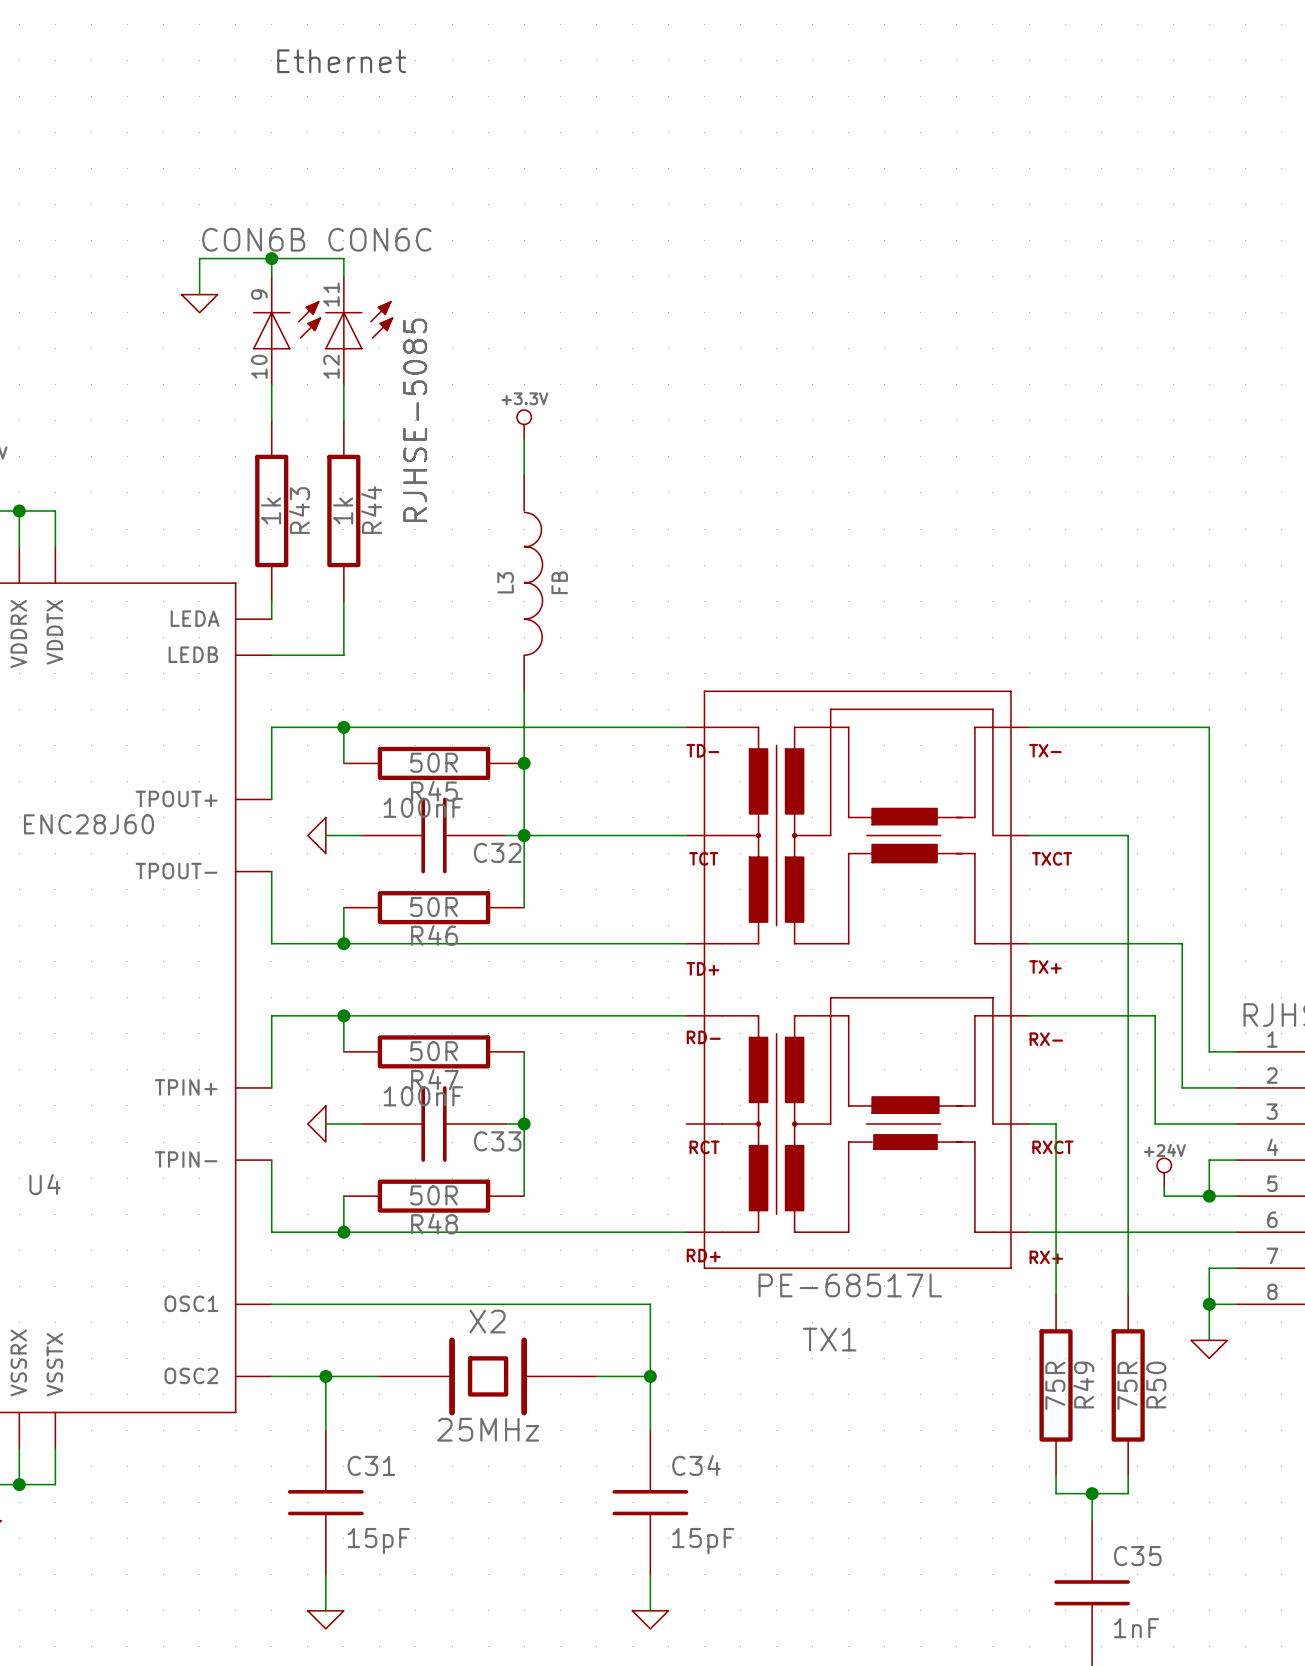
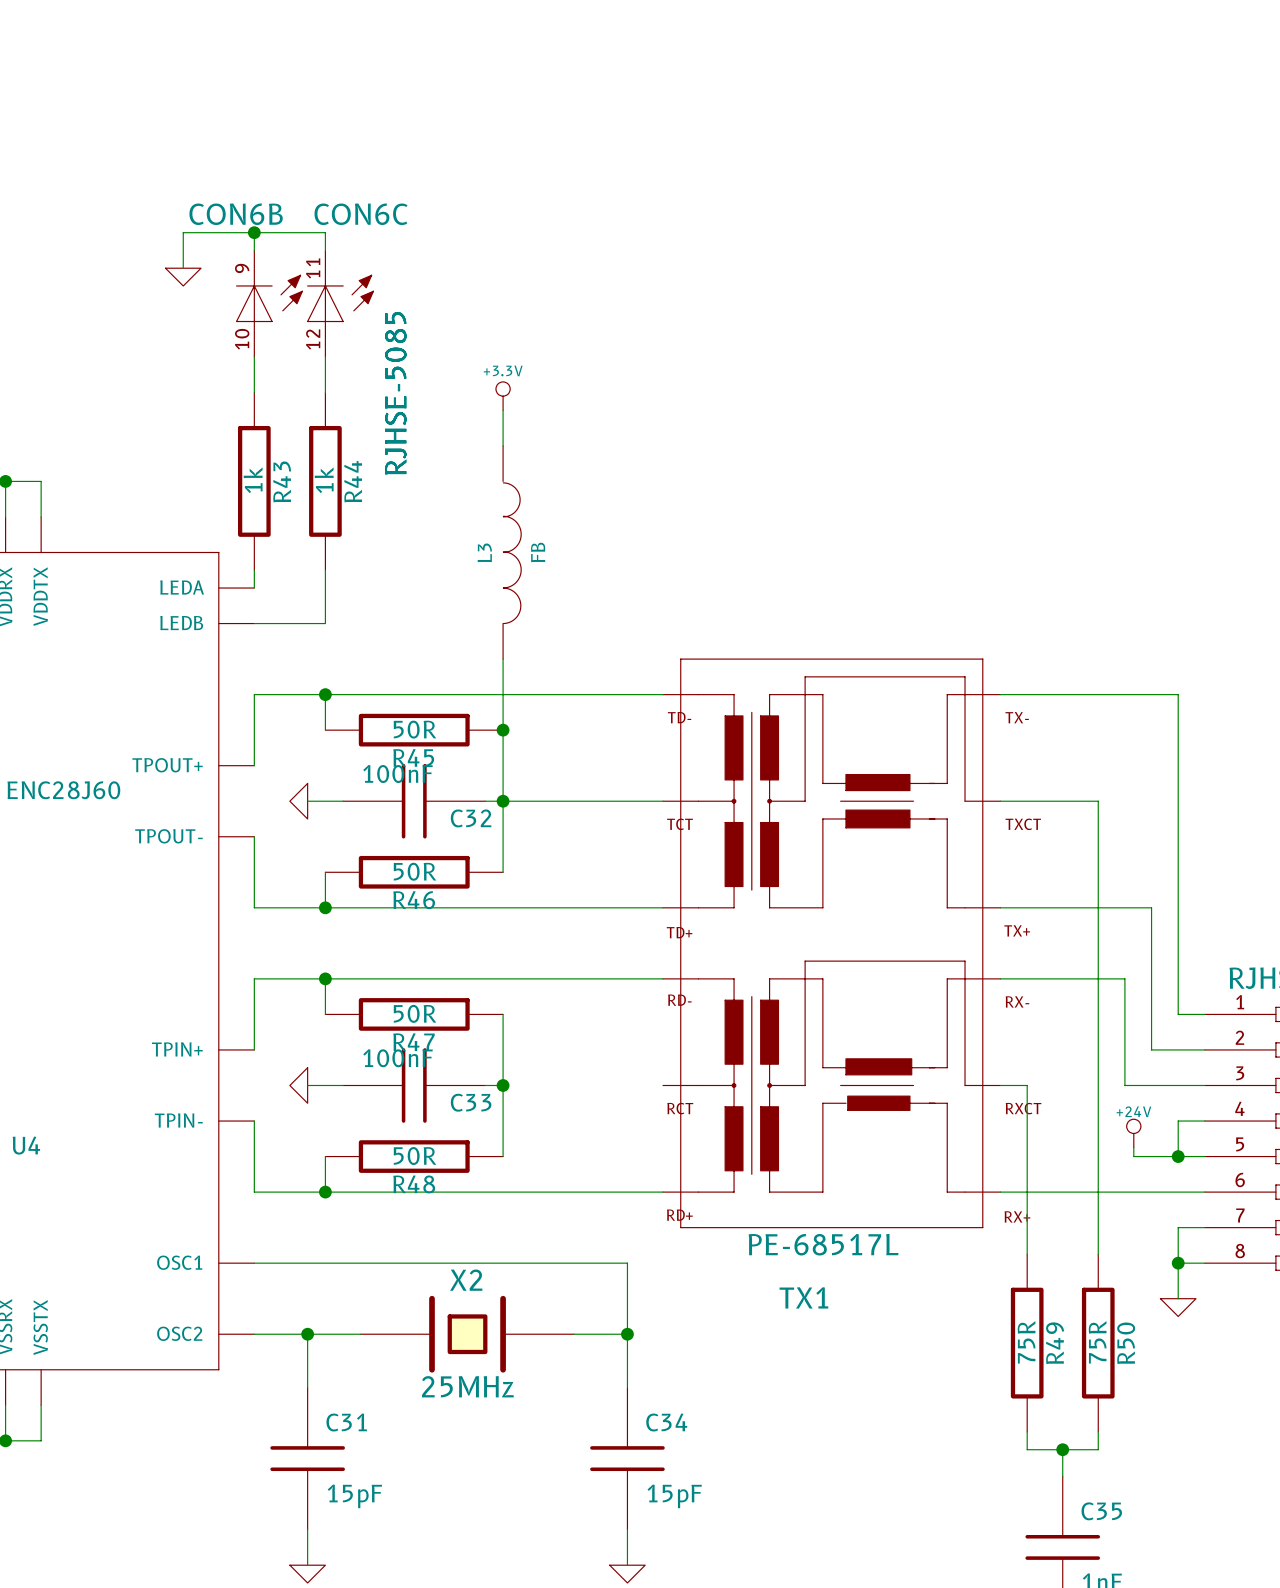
text: Ethernet (341, 61) -> none

